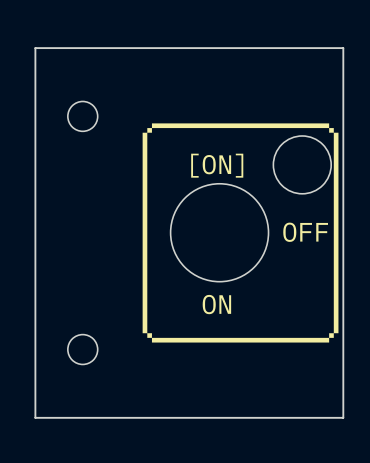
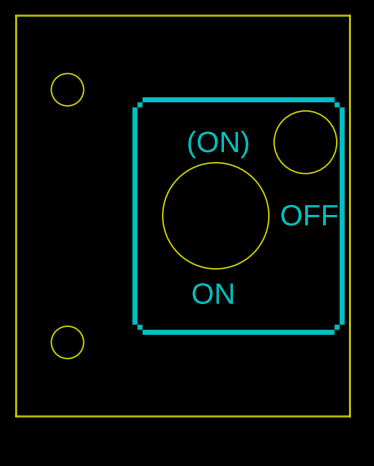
text: [ON] (217, 165) -> (ON) (218, 144)

